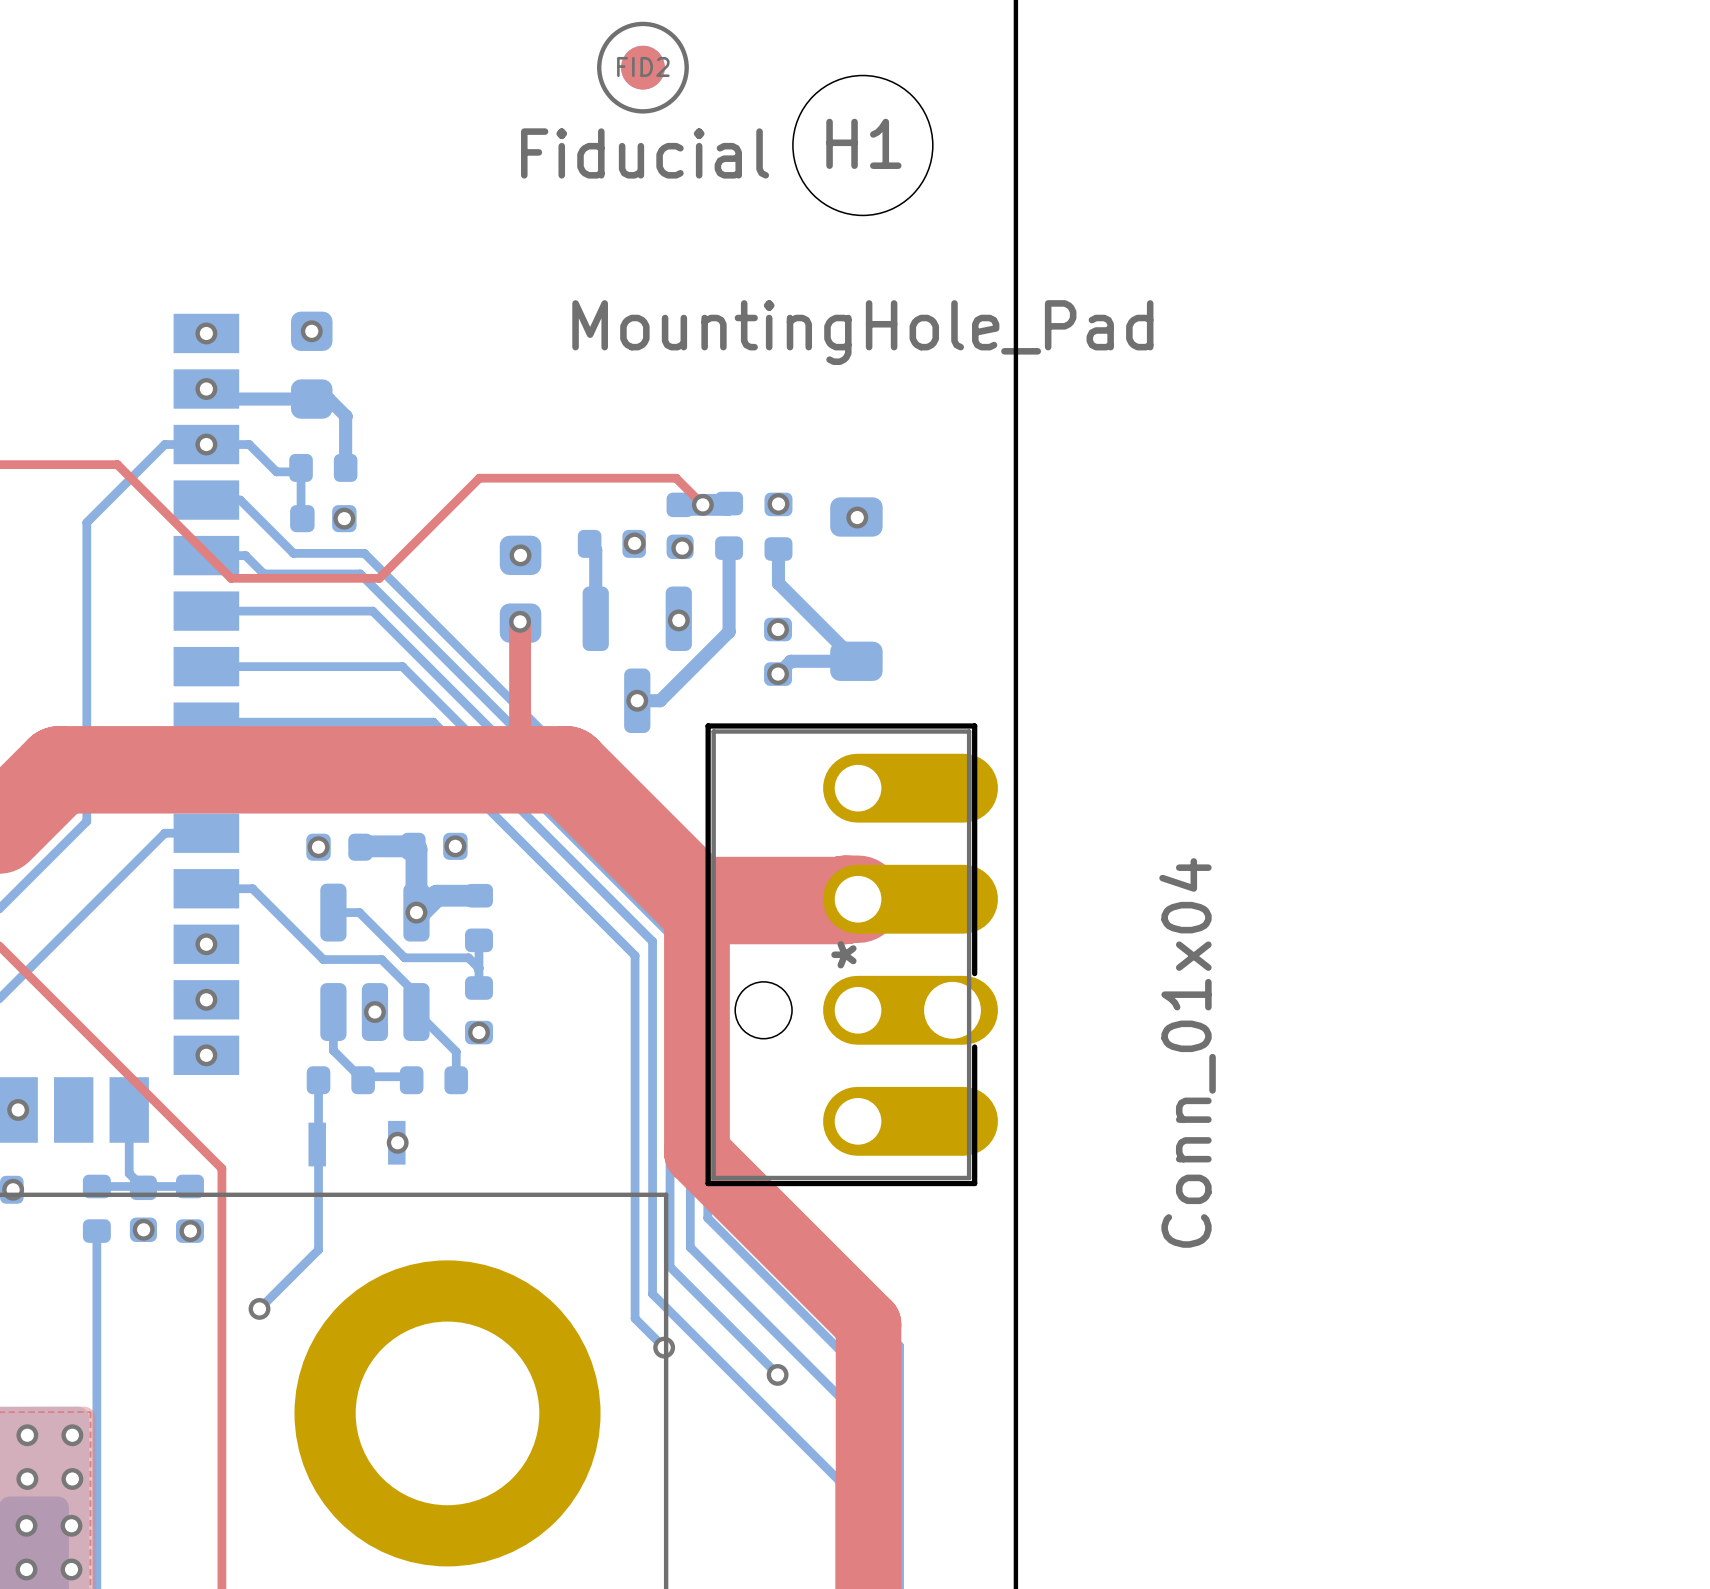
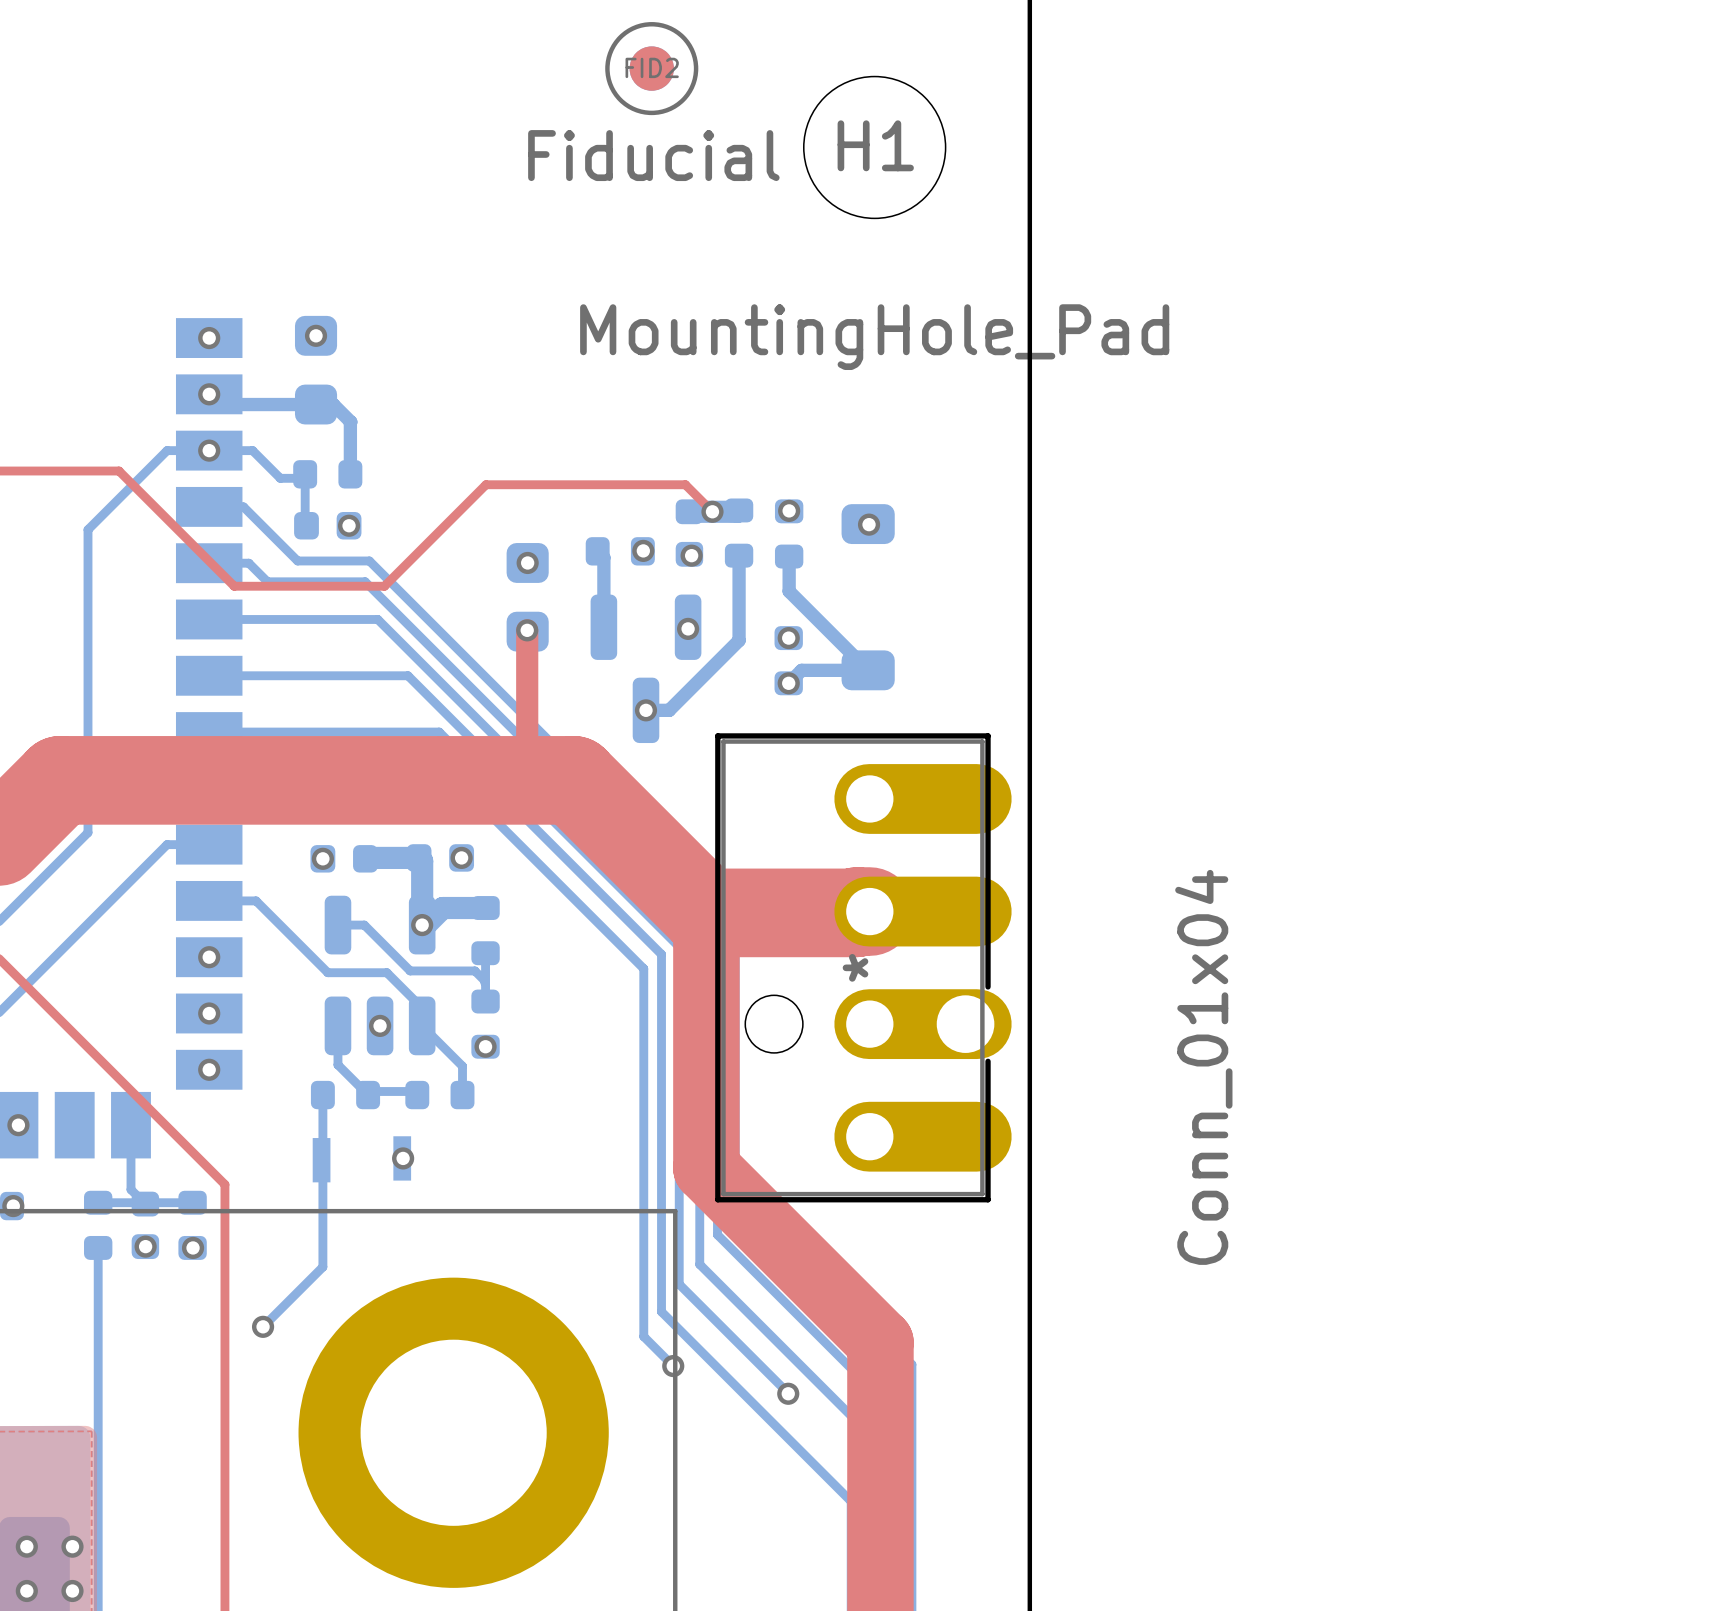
via: (27, 1435) -> none
via: (72, 1435) -> none
via: (27, 1478) -> none
via: (72, 1478) -> none

